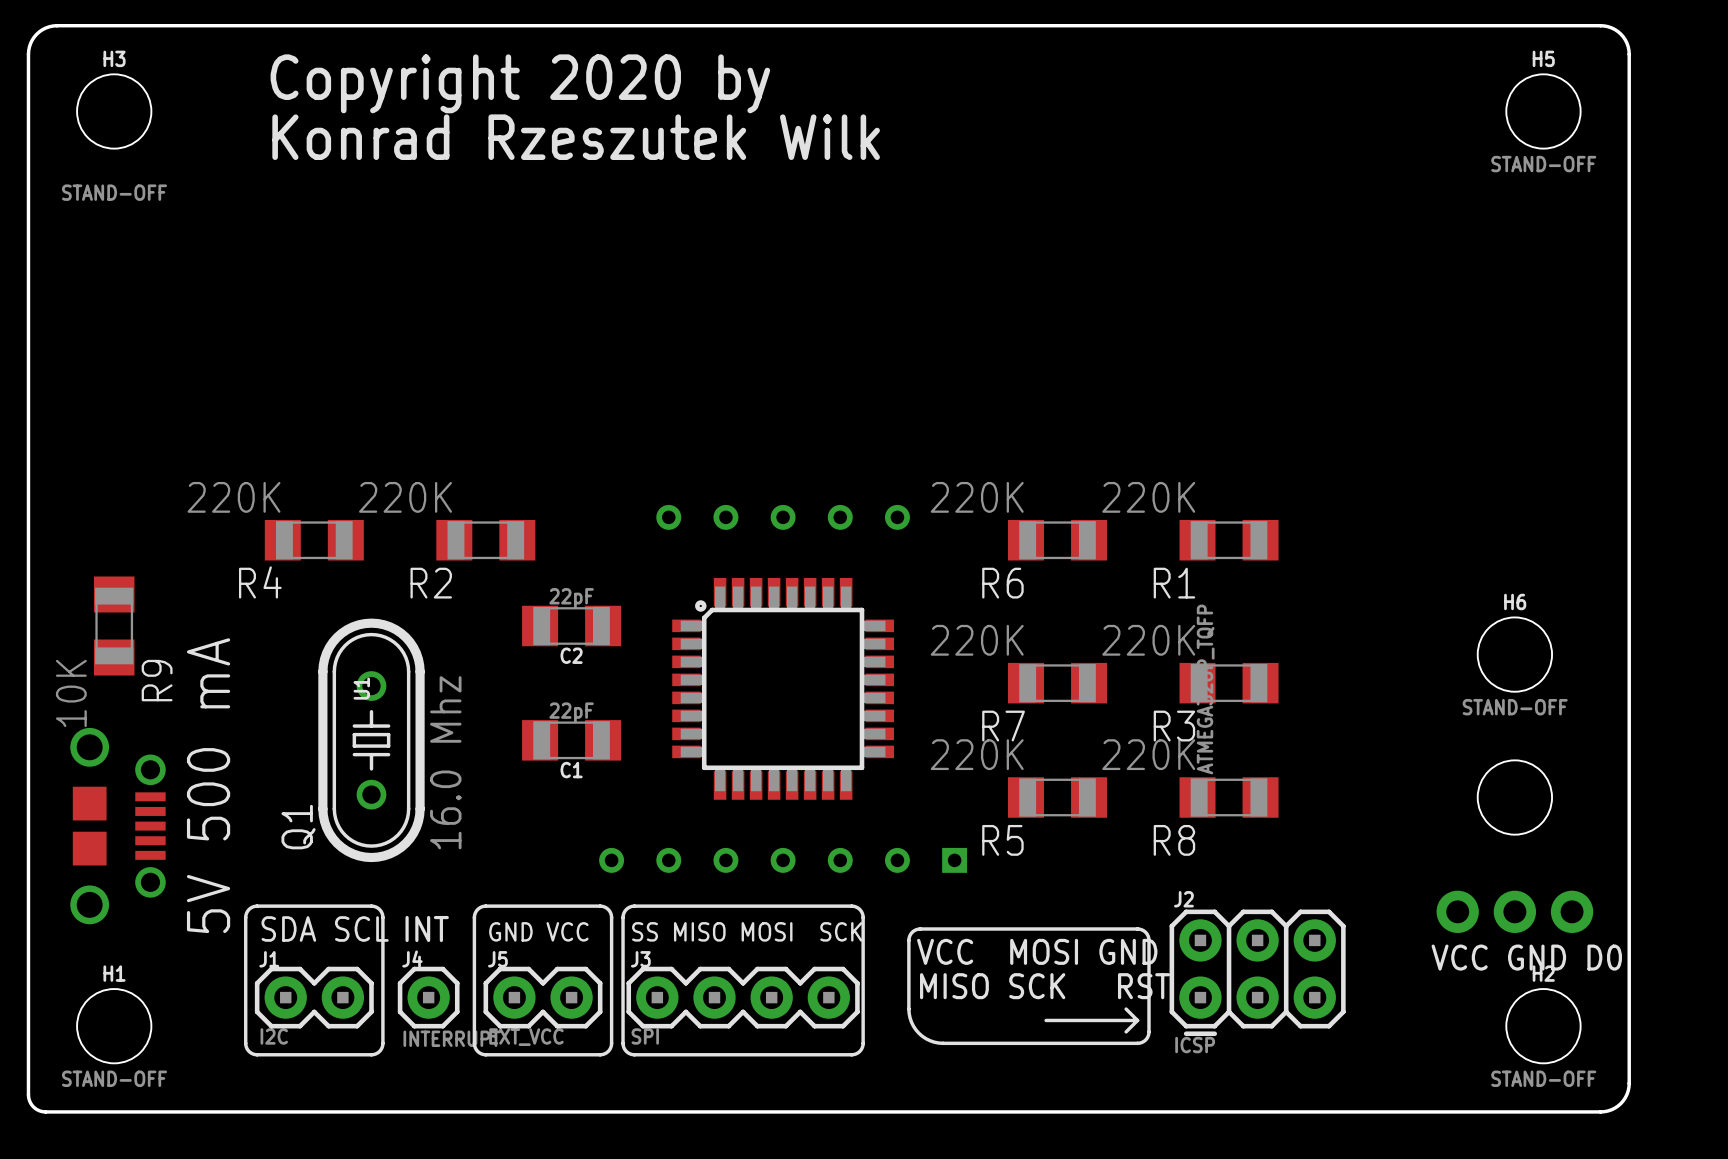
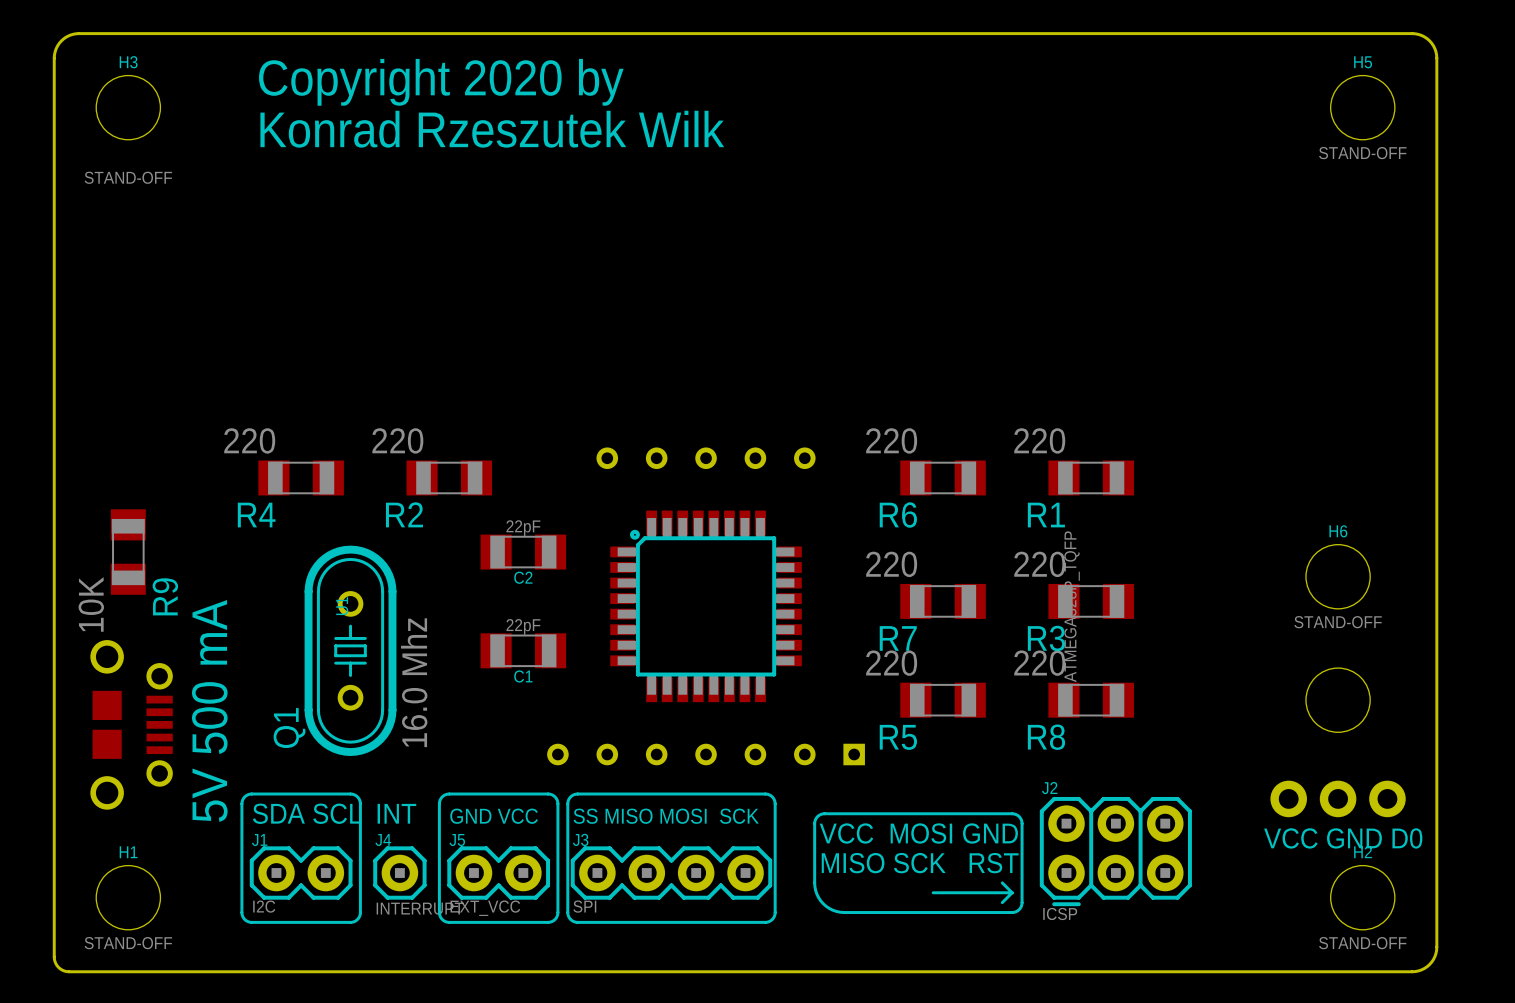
R4 value: 220K (234, 497) -> 220 (249, 440)
R2 value: 220K (405, 497) -> 220 (397, 440)
R6 value: 220K (977, 497) -> 220 (891, 440)
R1 value: 220K (1148, 497) -> 220 (1039, 440)
R7 value: 220K (977, 640) -> 220 (891, 564)
R3 value: 220K (1148, 640) -> 220 (1039, 564)
R5 value: 220K (977, 754) -> 220 (891, 663)
R8 value: 220K (1148, 754) -> 220 (1039, 663)

